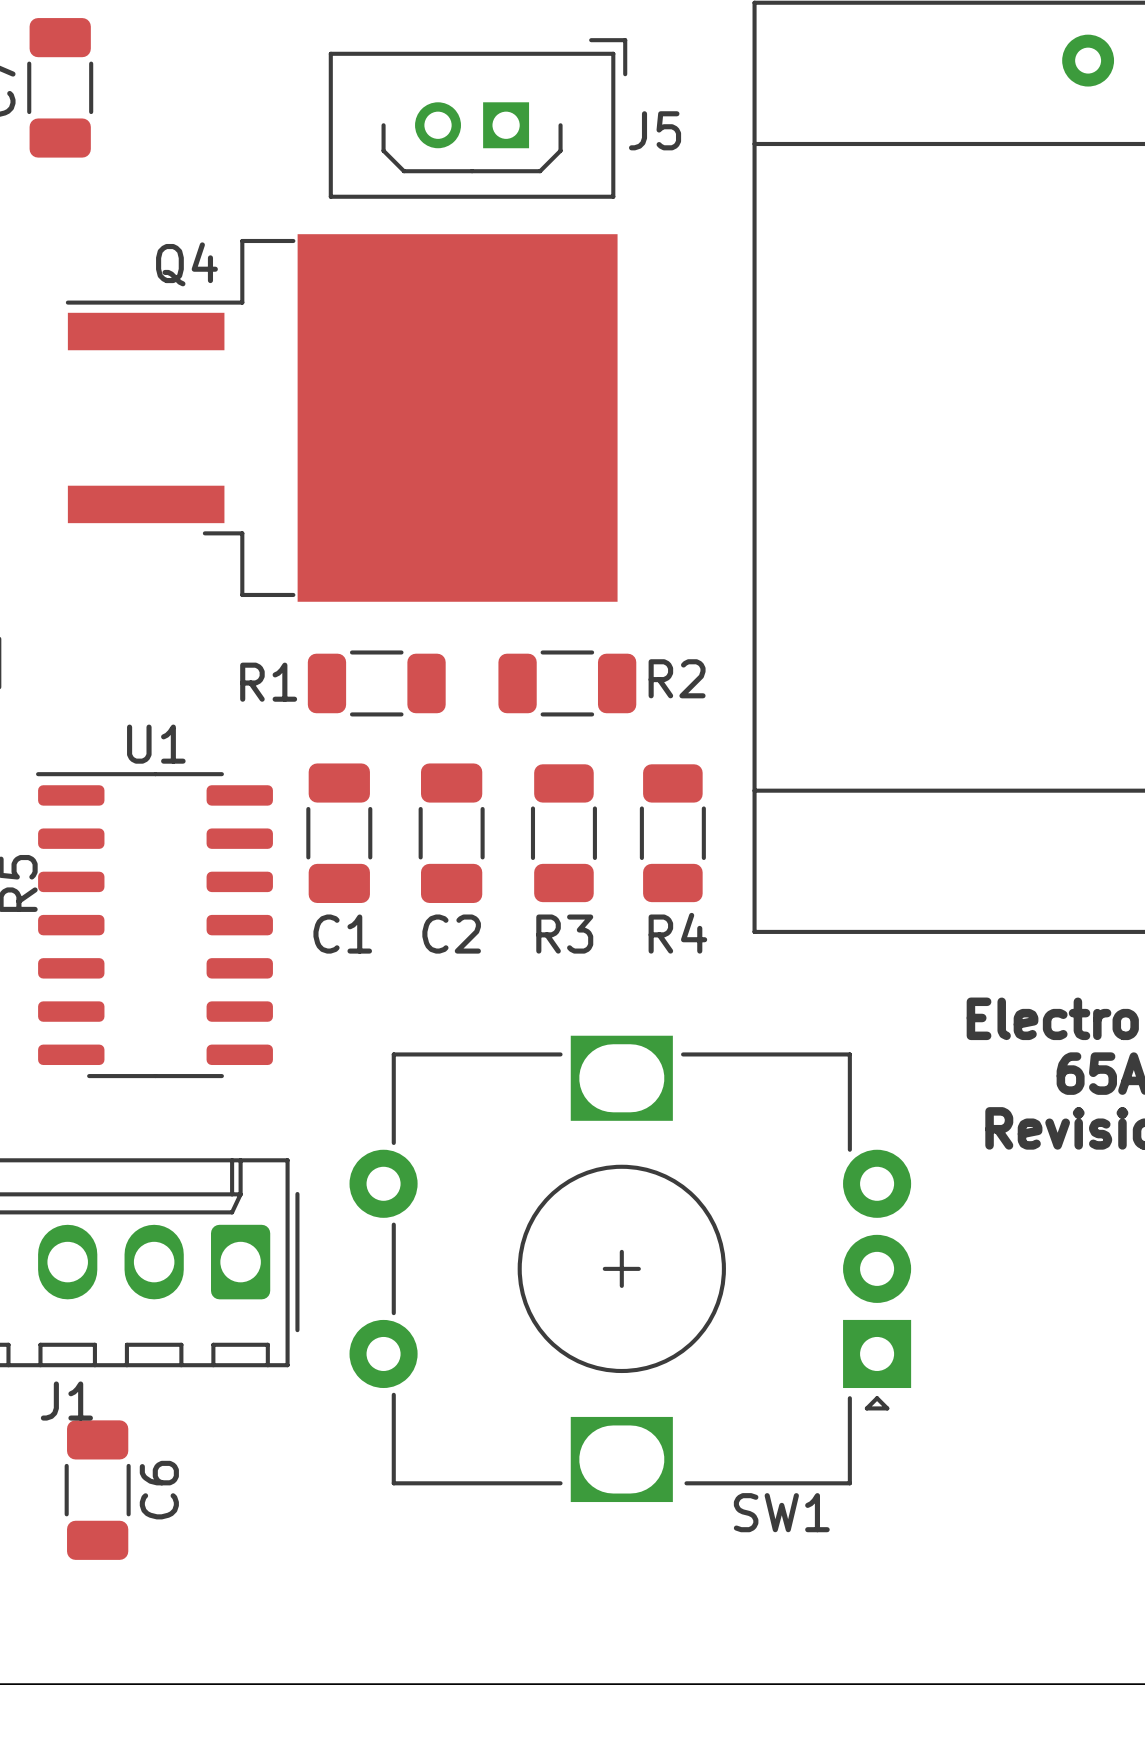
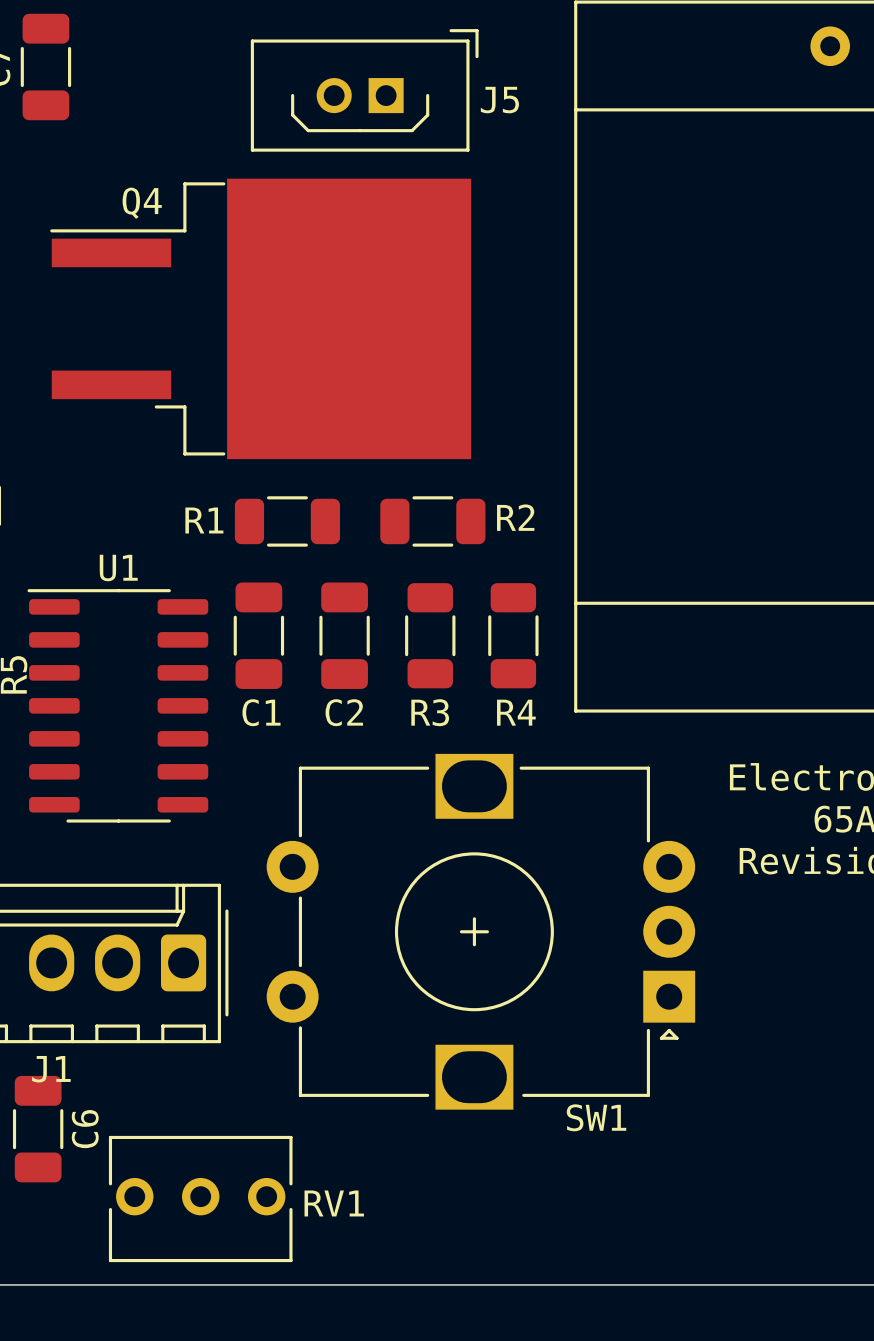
SW1 position: (630, 1268) -> (480, 931)
C6 position: (97, 1490) -> (38, 1129)
RV1: none -> (200, 1199)

